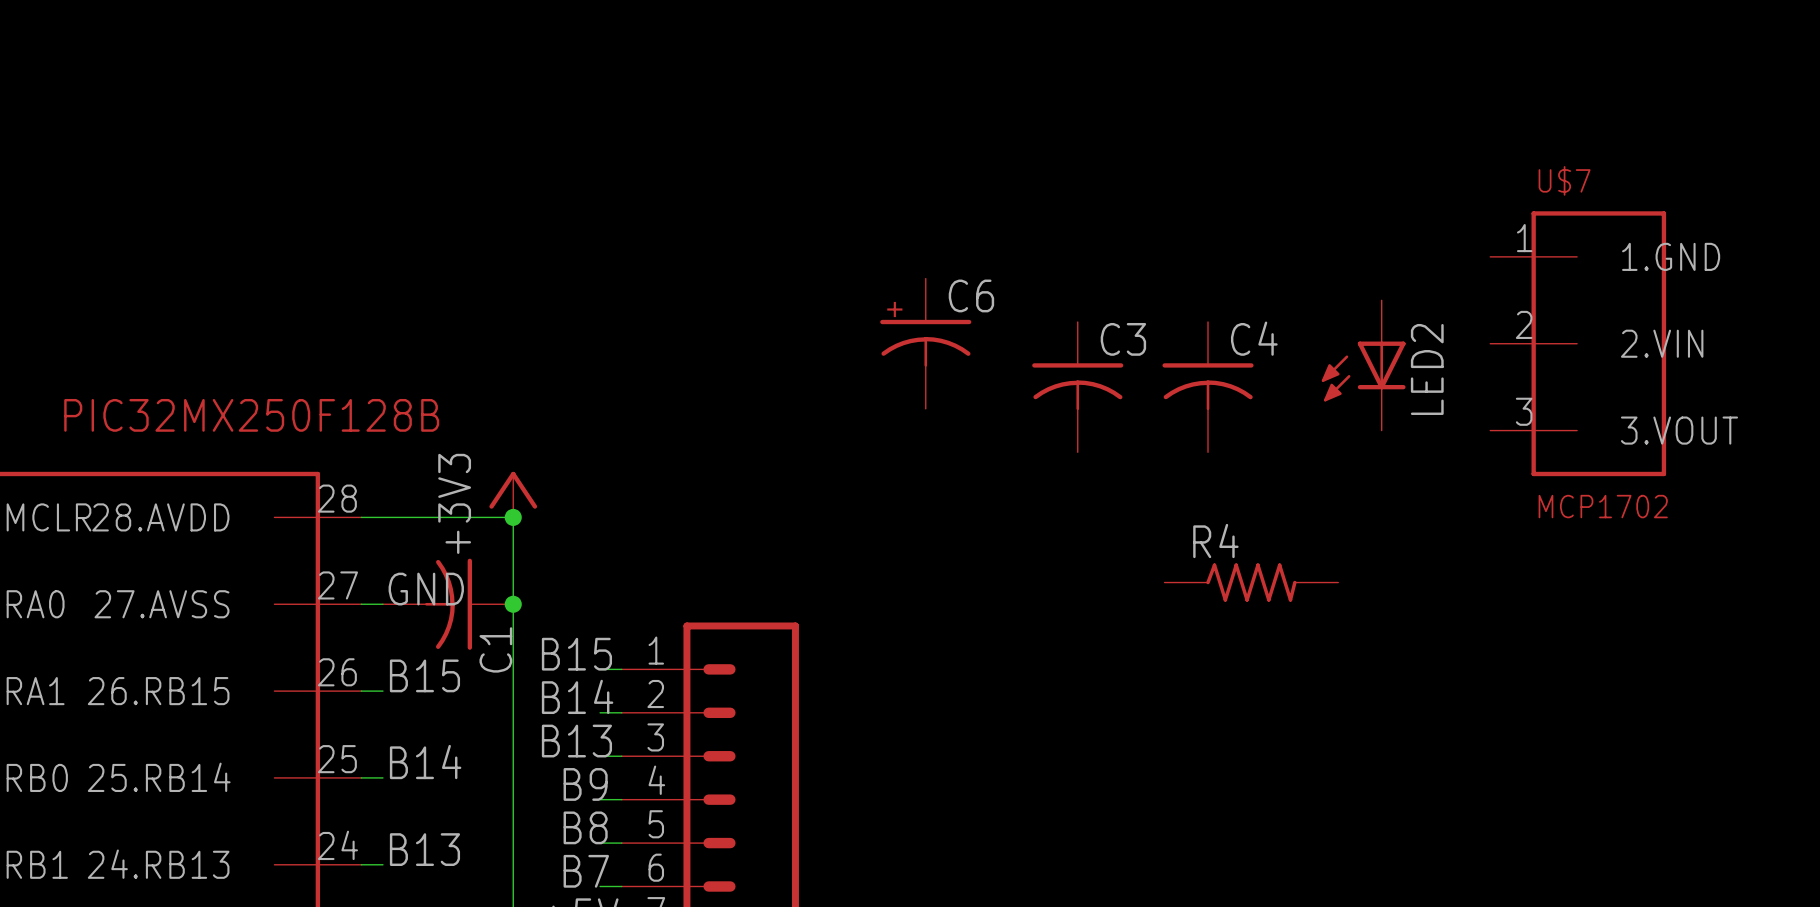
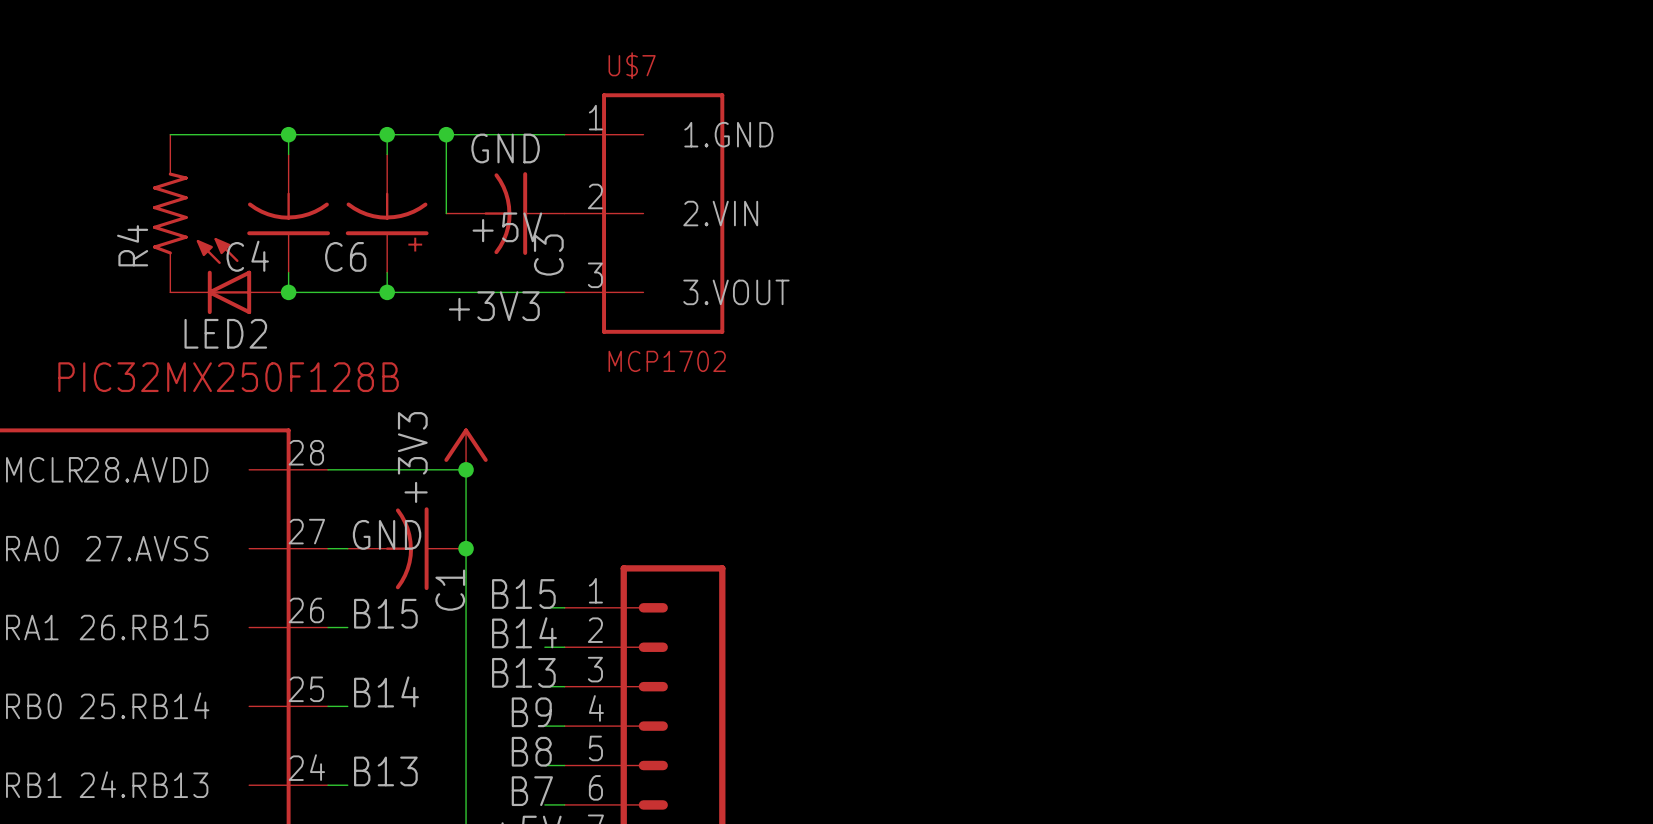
wire: none -> (170, 134) (564, 134)
wire: none -> (288, 134) (288, 154)
junction: none -> (288, 134)
wire: none -> (387, 134) (387, 154)
junction: none -> (387, 134)
wire: none -> (446, 134) (446, 213)
junction: none -> (446, 134)
label: none -> GND (505, 148)
label: none -> +5V (507, 227)
wire: none -> (288, 272) (288, 292) (564, 292)
wire: none -> (387, 272) (387, 292)
junction: none -> (288, 292)
junction: none -> (387, 292)
C6 rotation: 0° (925, 334) -> 180° (387, 222)
label: none -> +3V3 (494, 306)
C6 position: (925, 343) -> (387, 213)
U$7 position: (1578, 343) -> (644, 213)
LED2 position: (1363, 365) -> (229, 276)
LED2 rotation: 0° (1363, 371) -> 90° clockwise (223, 276)
C3 rotation: 0° (1077, 386) -> 90° clockwise (505, 213)
C4 rotation: 0° (1208, 386) -> 180° (288, 213)
C3 position: (1077, 387) -> (505, 213)
C4 position: (1208, 387) -> (288, 213)
R4 rotation: 0° (1251, 582) -> 90° counterclockwise (170, 213)
R4 position: (1251, 582) -> (170, 213)

